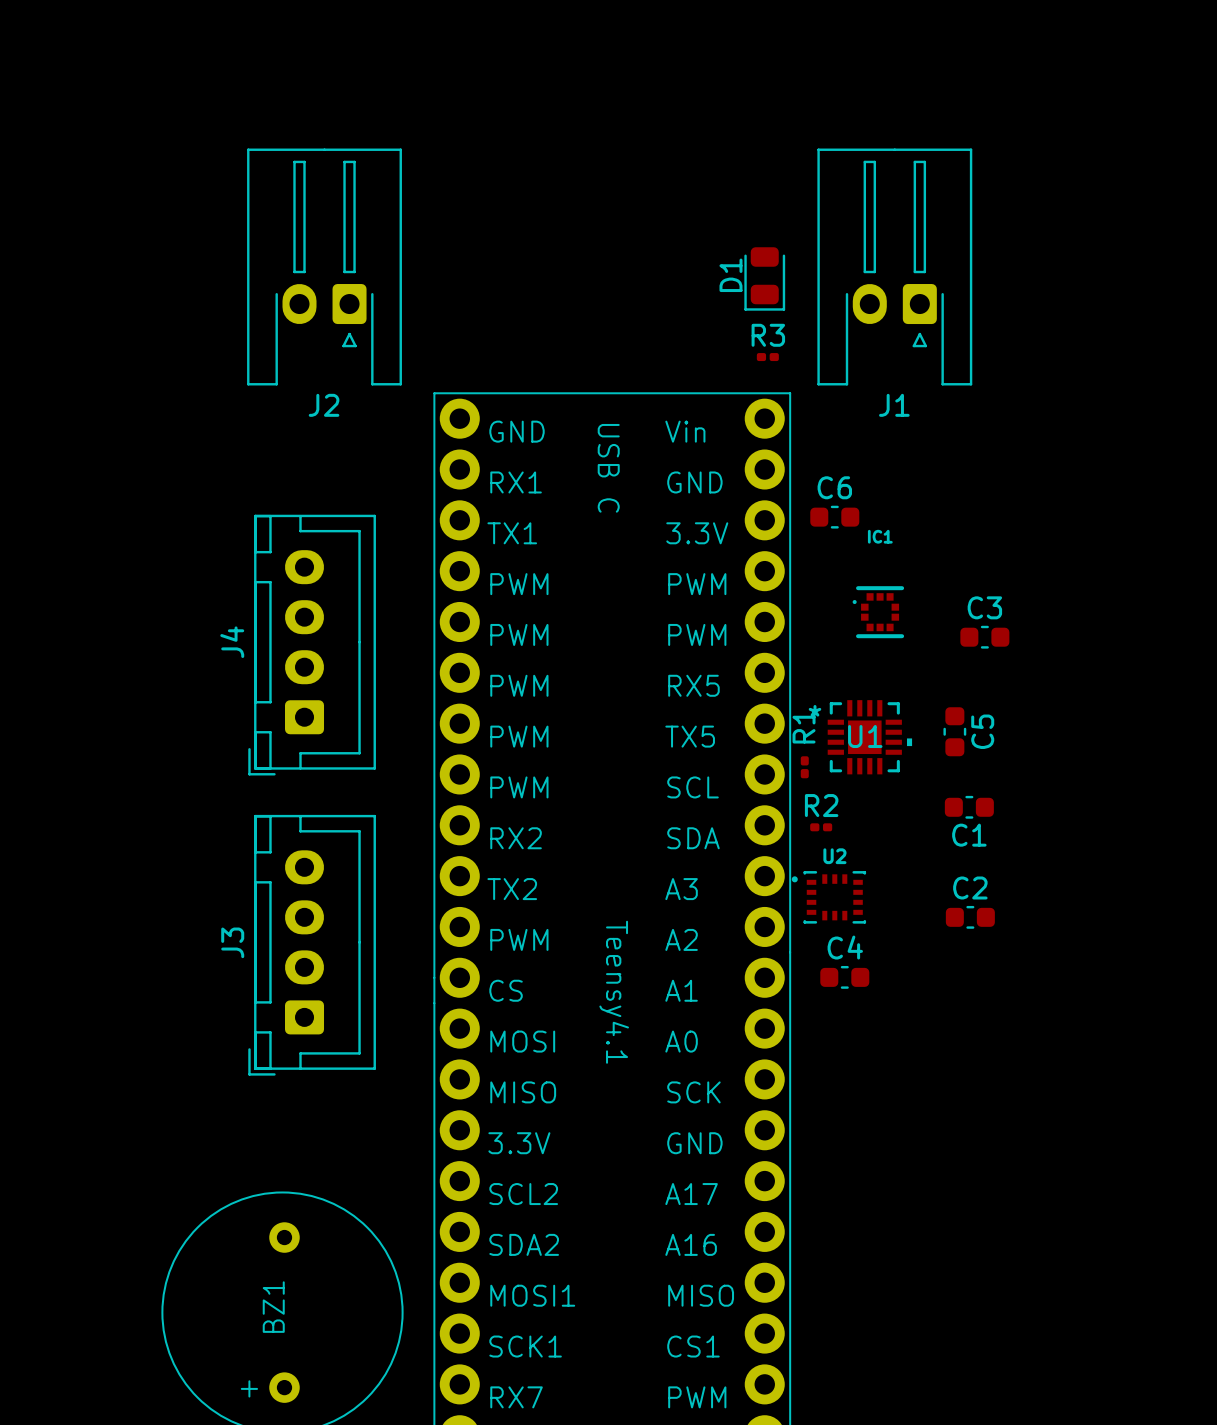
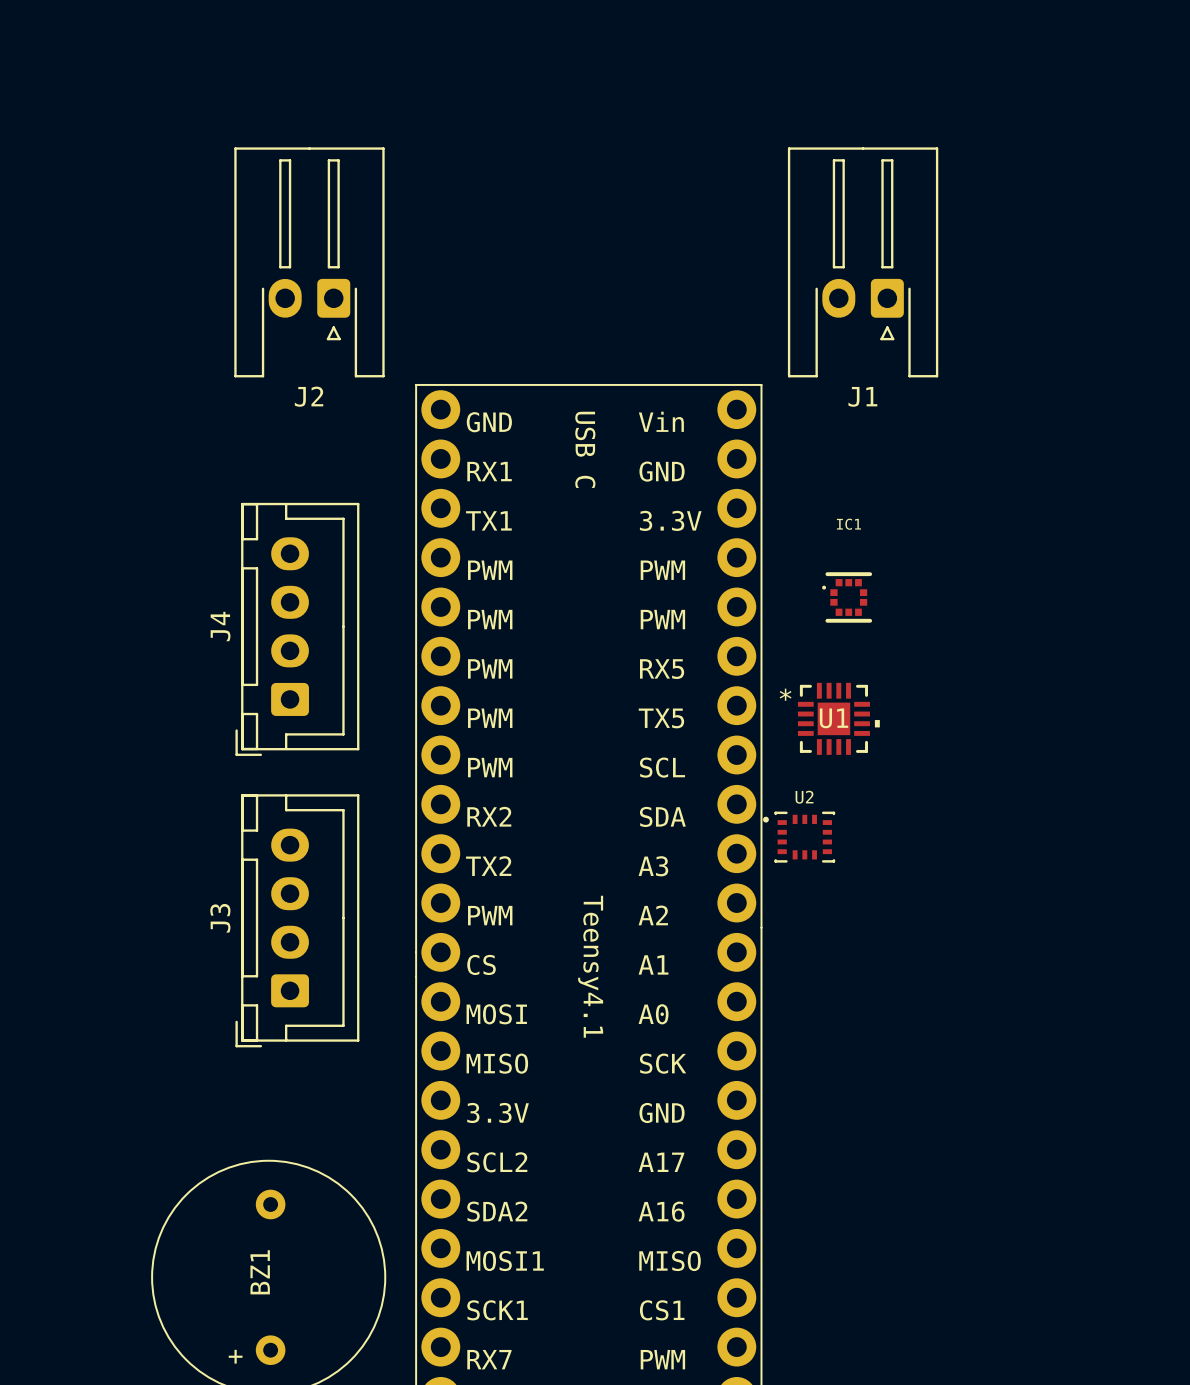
D1: (764, 278) -> none
R3: (767, 357) -> none
C6: (834, 517) -> none
C3: (984, 637) -> none
C5: (954, 731) -> none
R1: (804, 767) -> none
C1: (969, 807) -> none
R2: (821, 827) -> none
U2 position: (828, 897) -> (799, 837)
C2: (970, 917) -> none
C4: (844, 977) -> none

